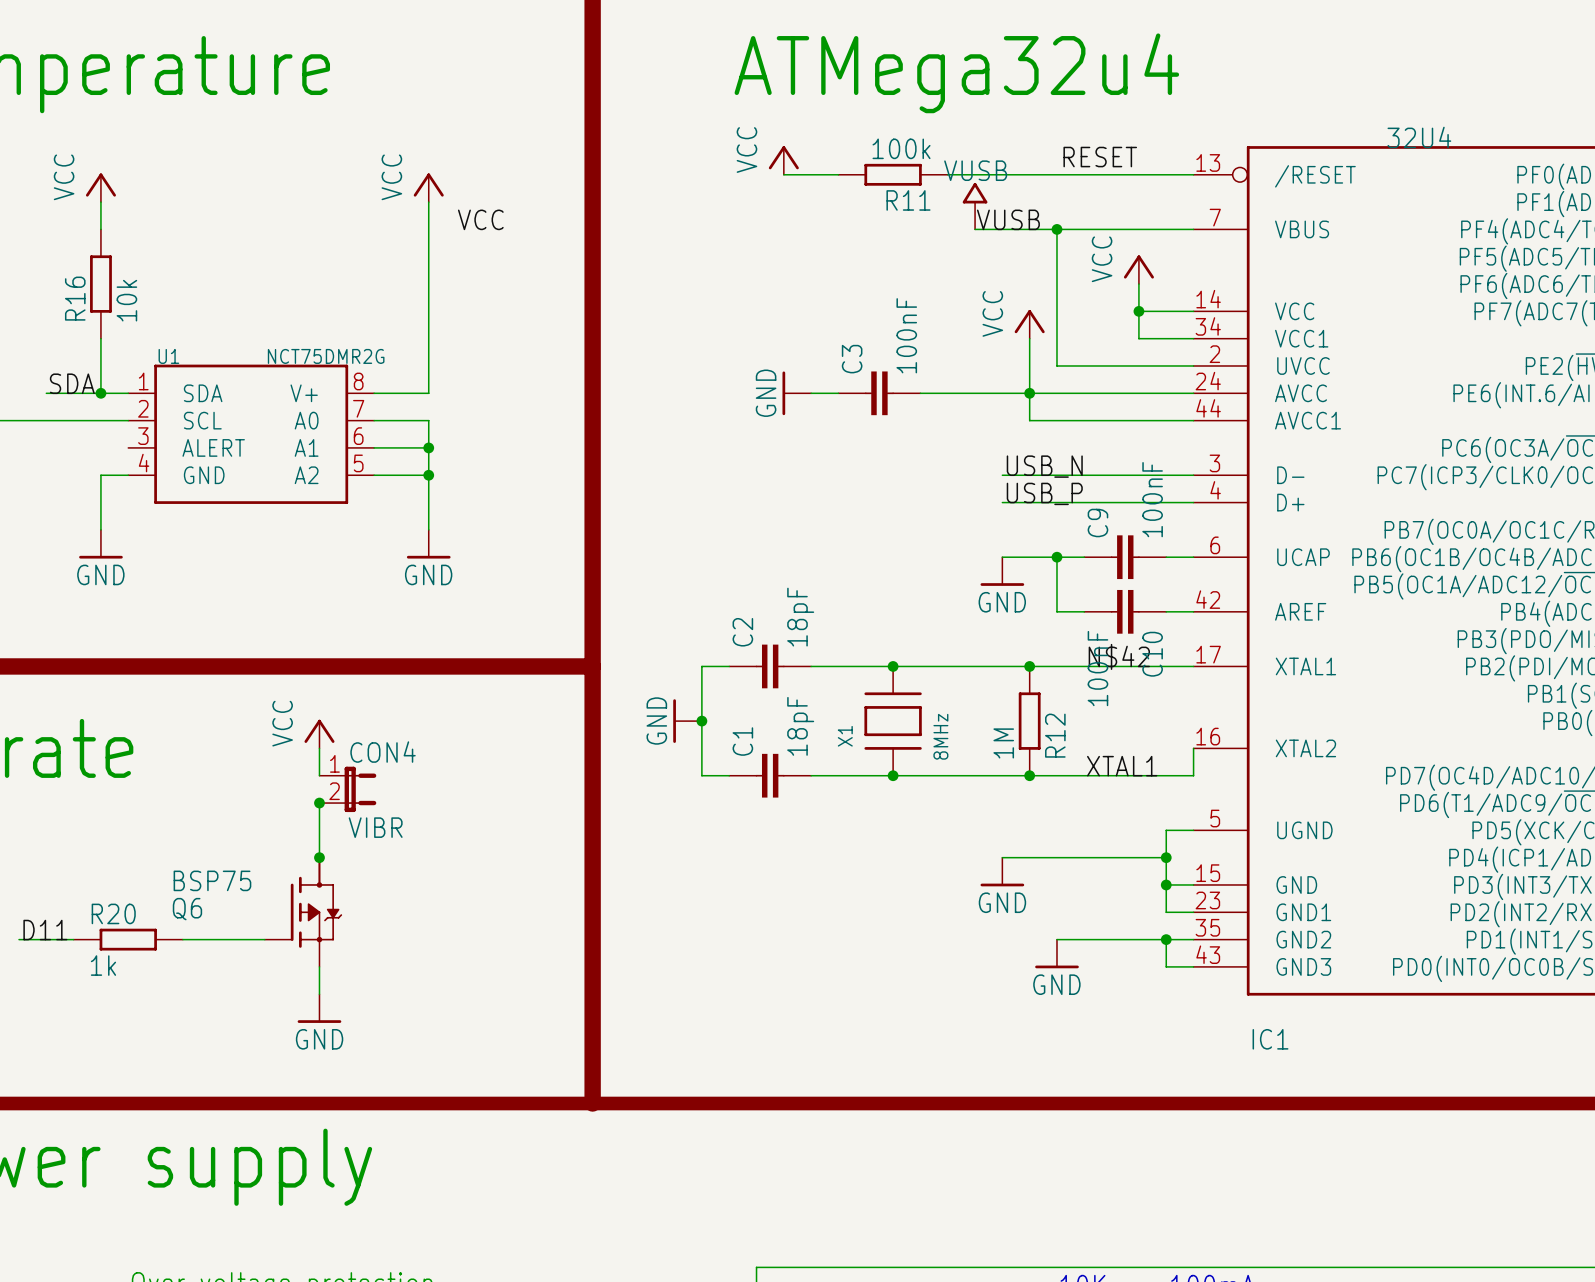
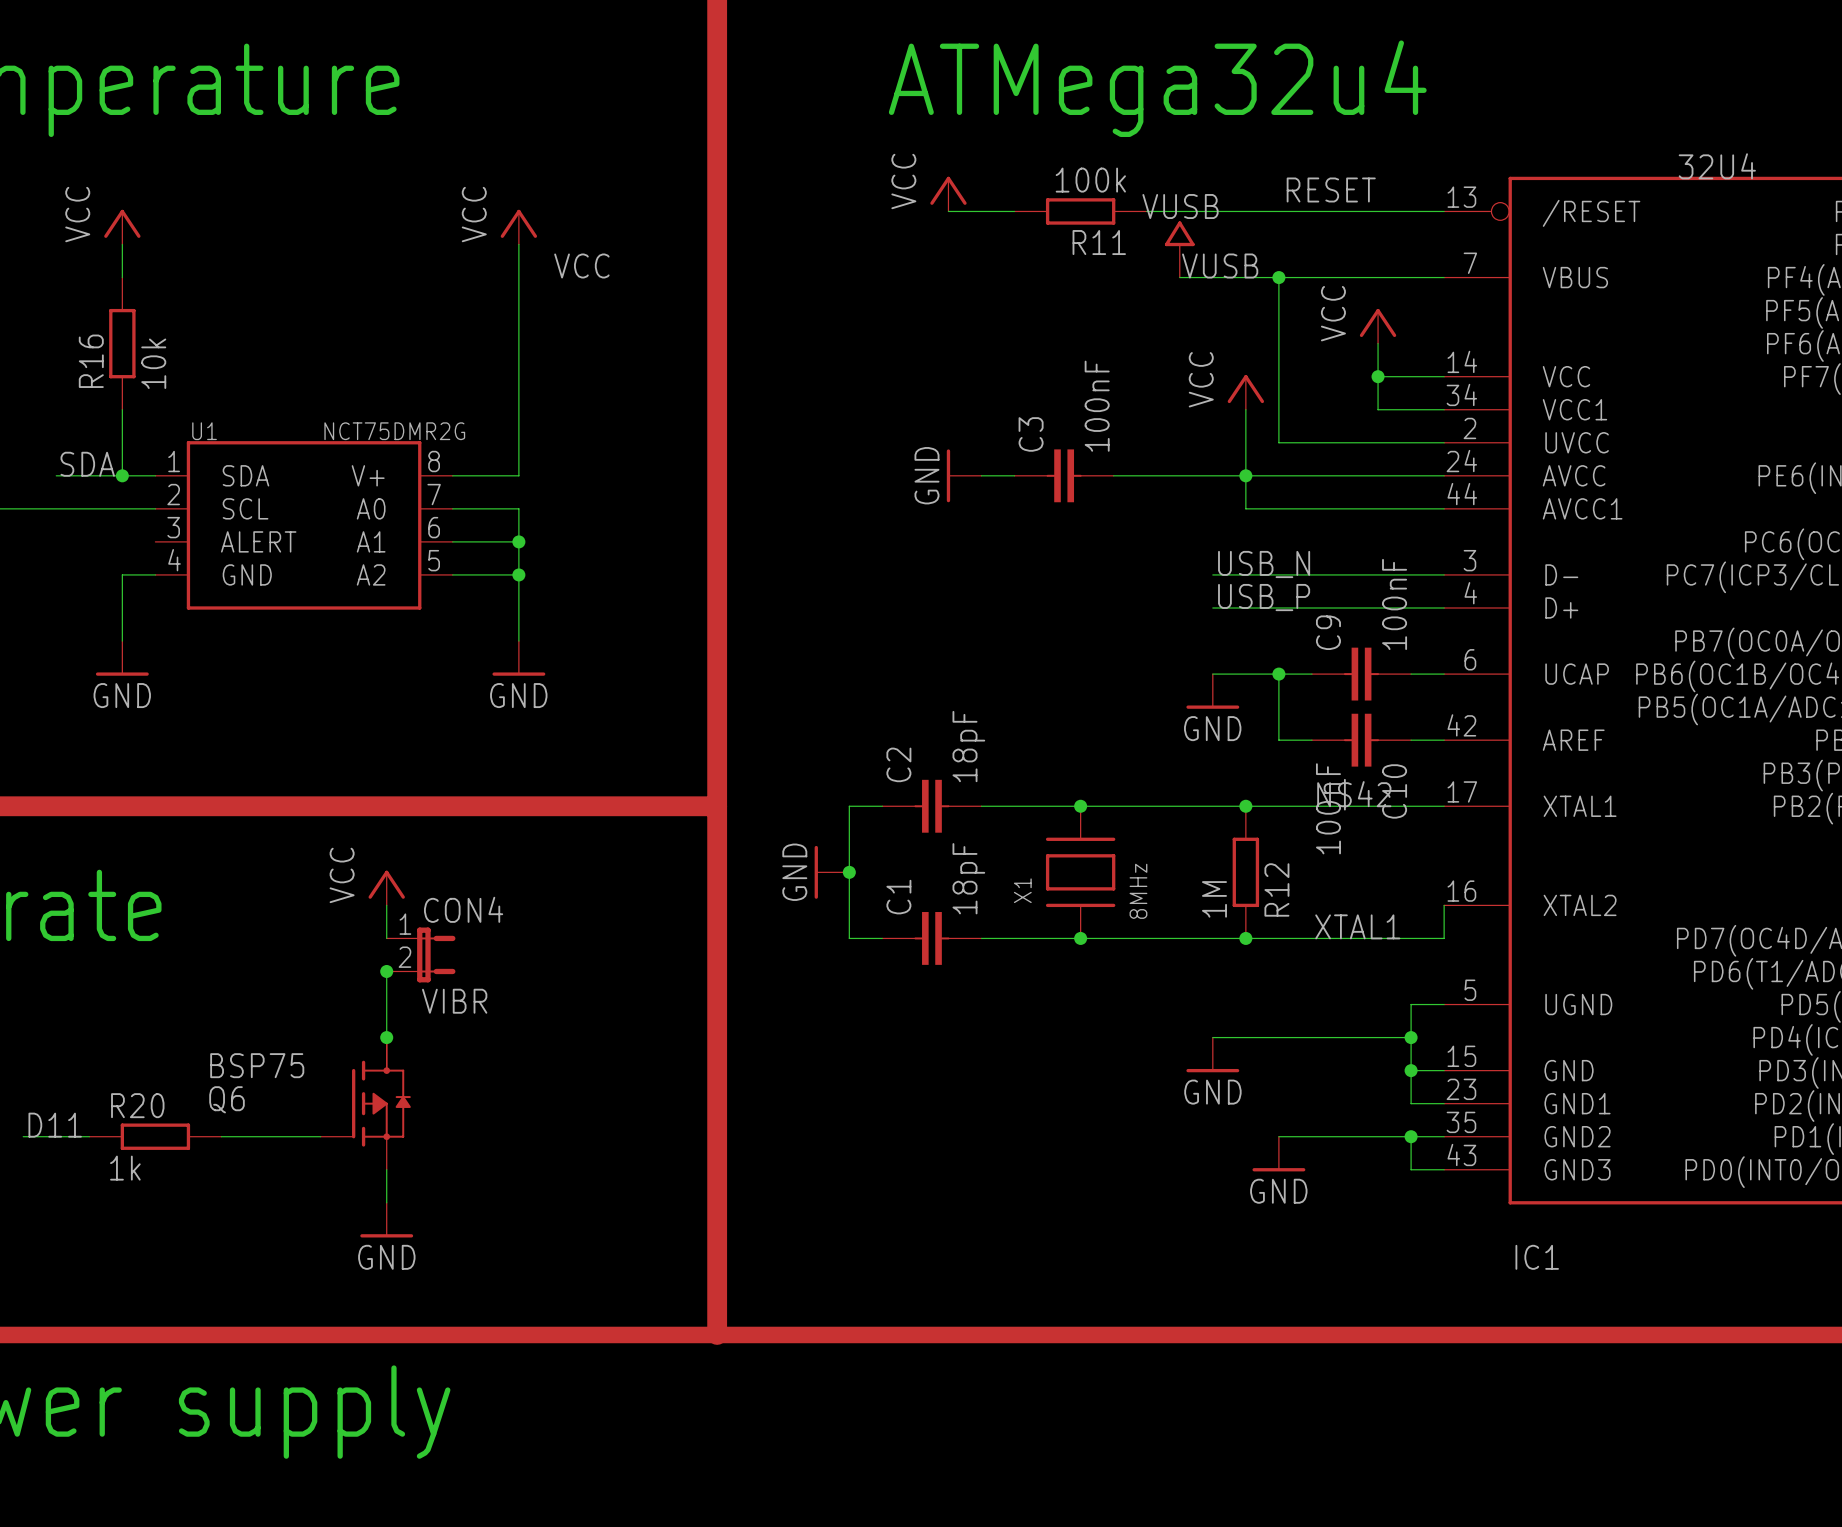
Q6 symbol: [264, 857, 343, 967] -> [320, 1037, 411, 1170]

